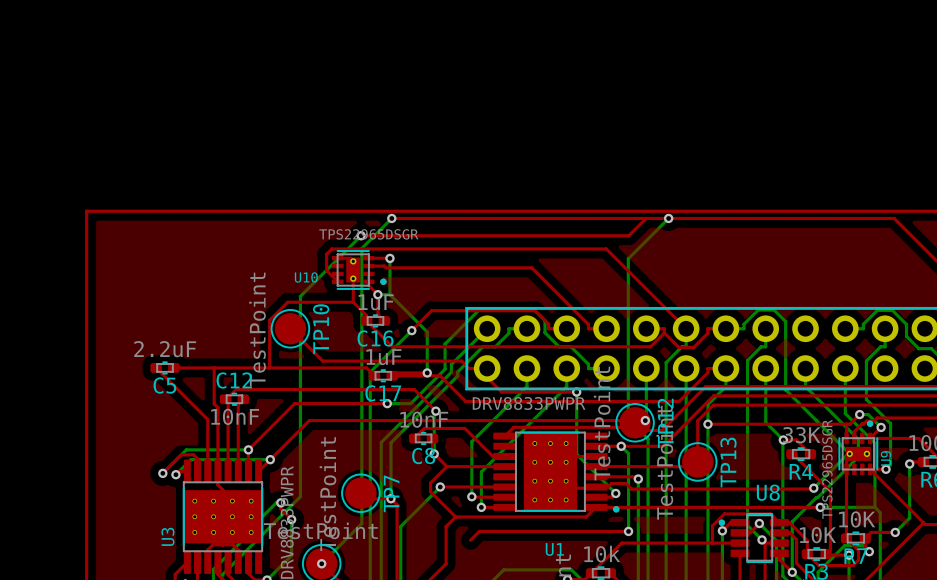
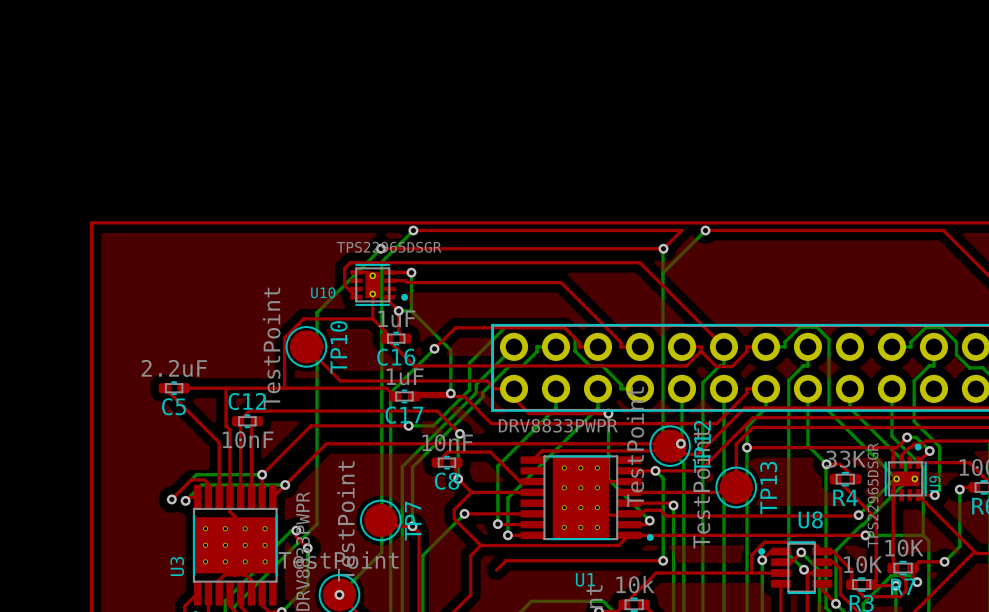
top track: (646, 218) (668, 218) -> none
via: none -> (663, 248)

